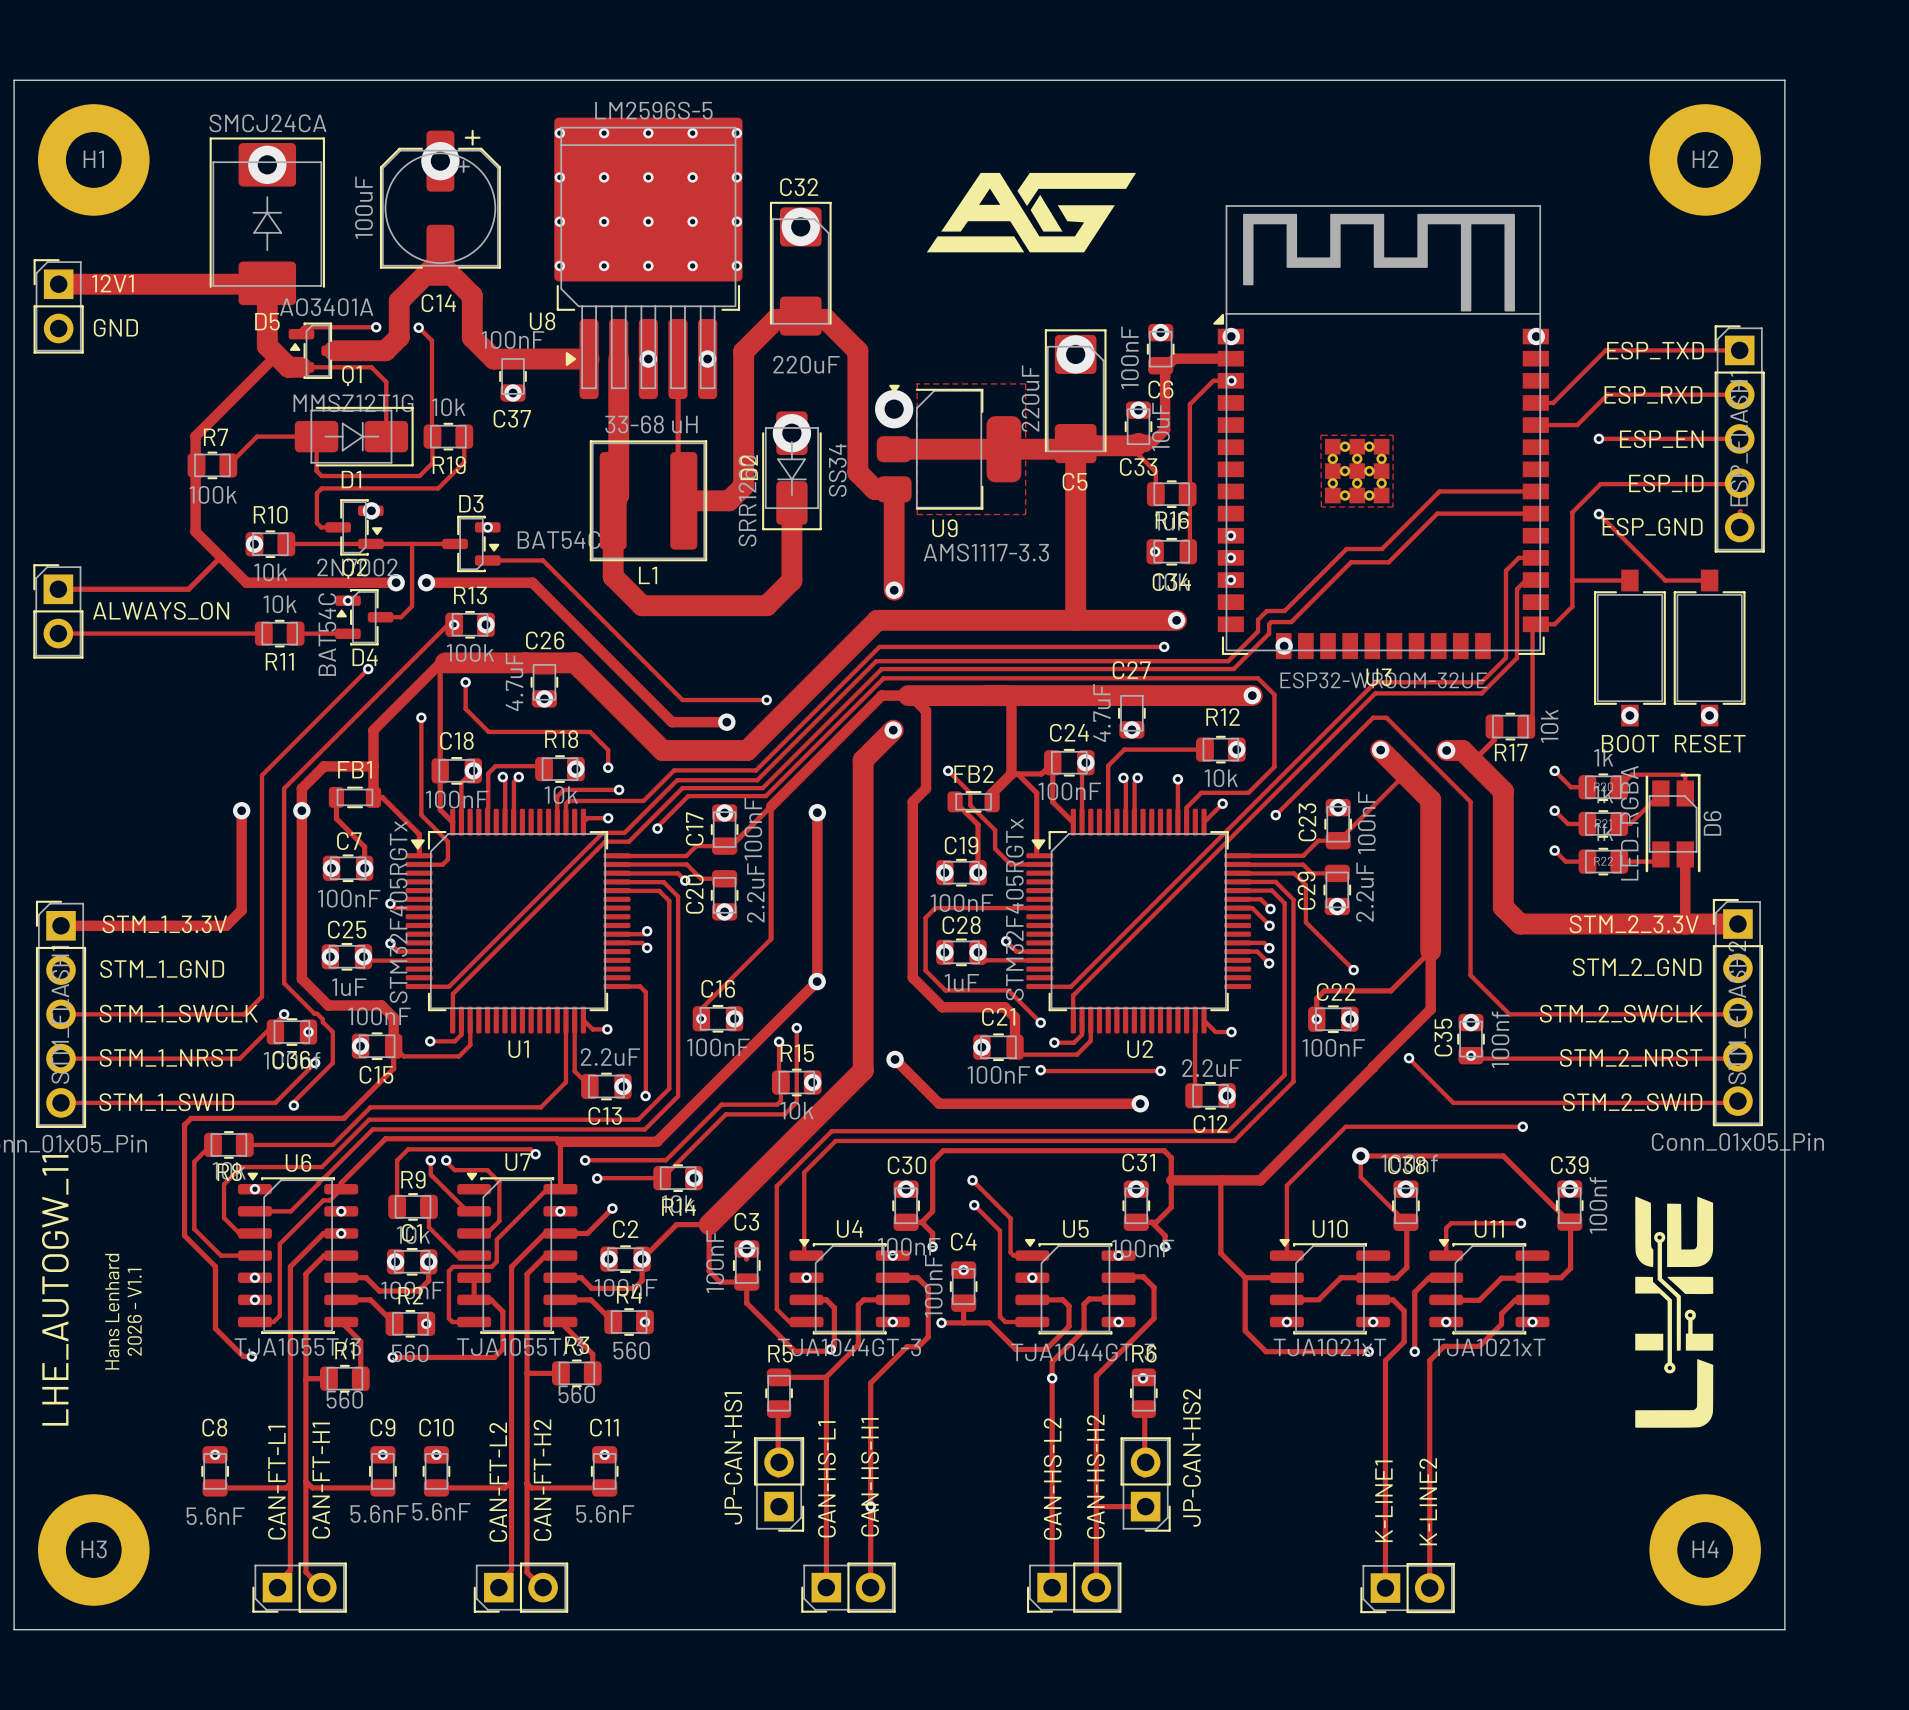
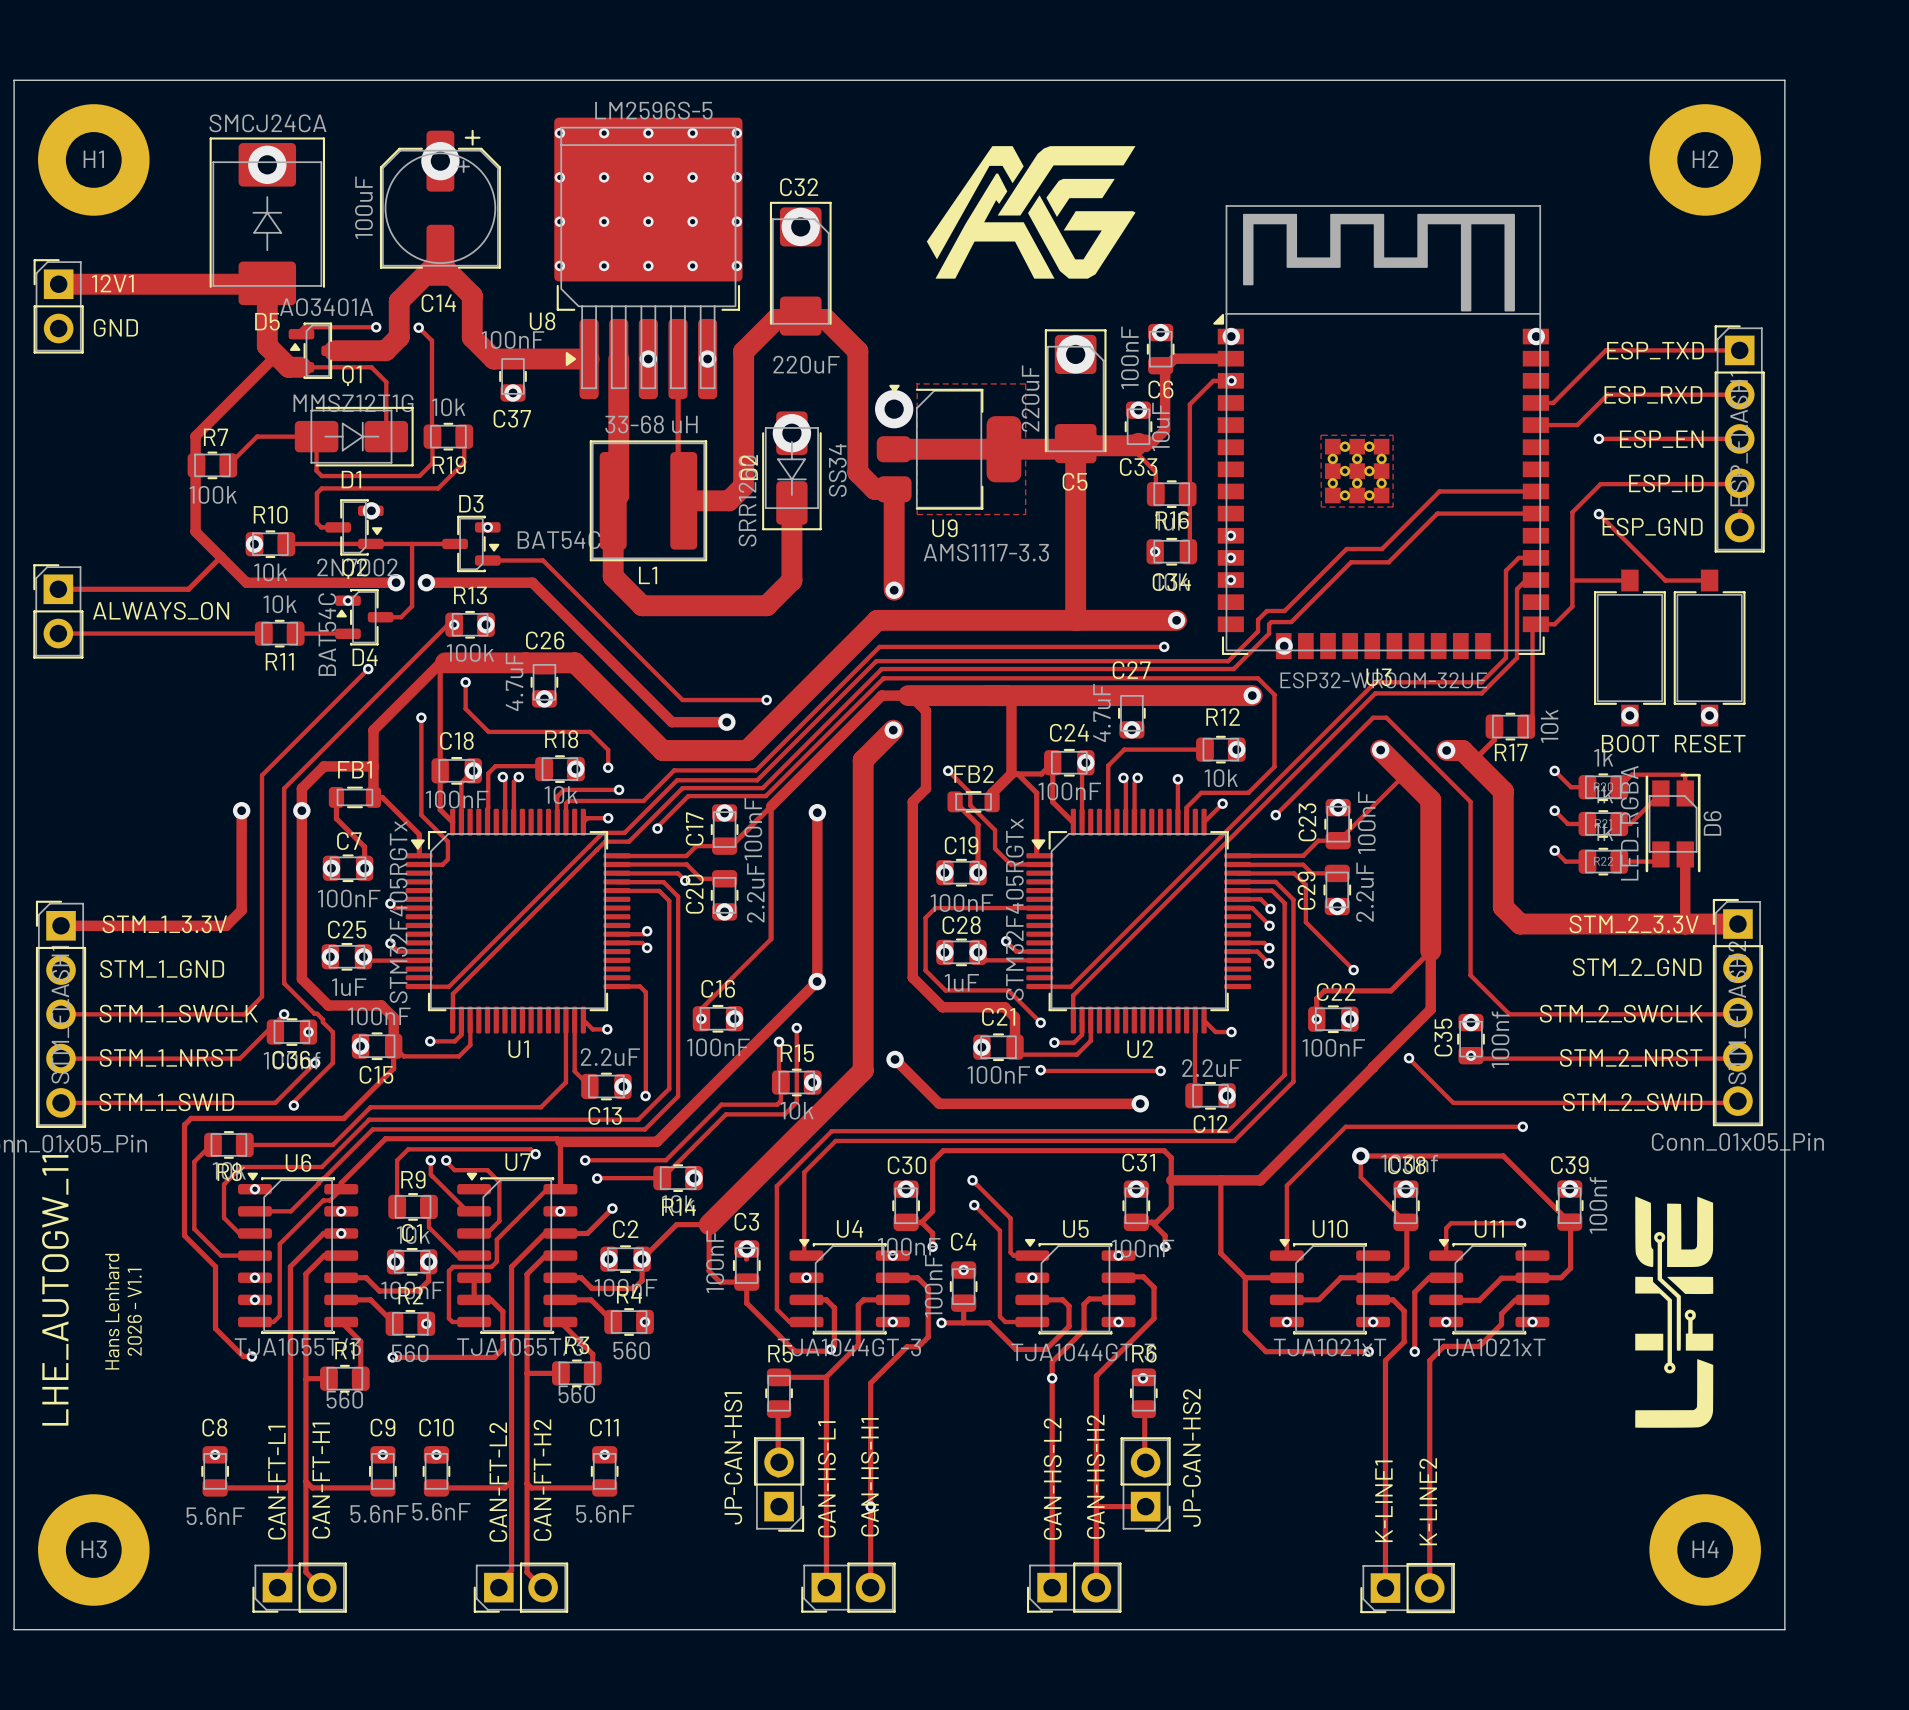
drawing shape: [926, 172, 1136, 253] -> [926, 146, 1136, 279]

